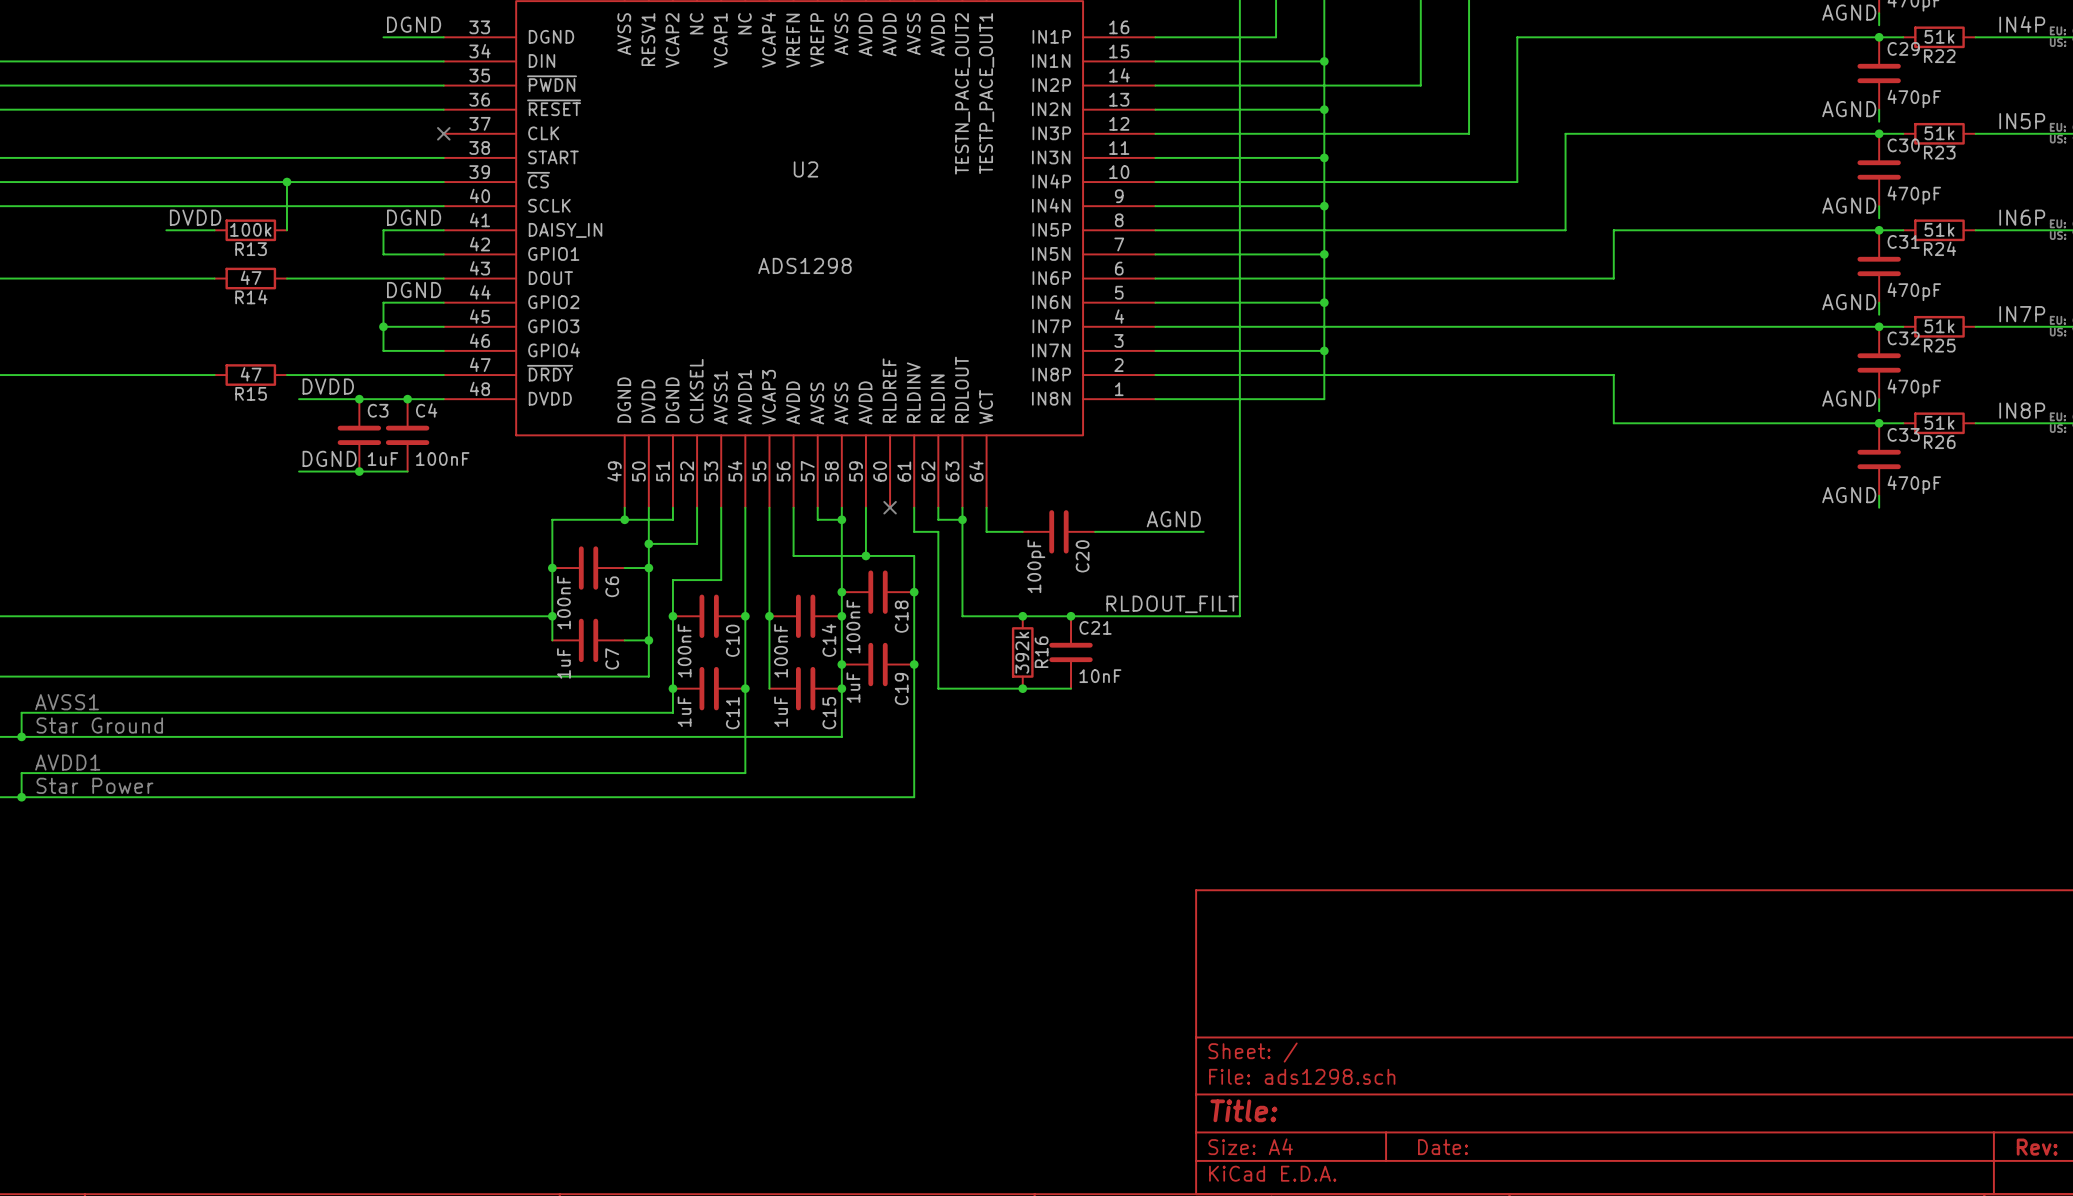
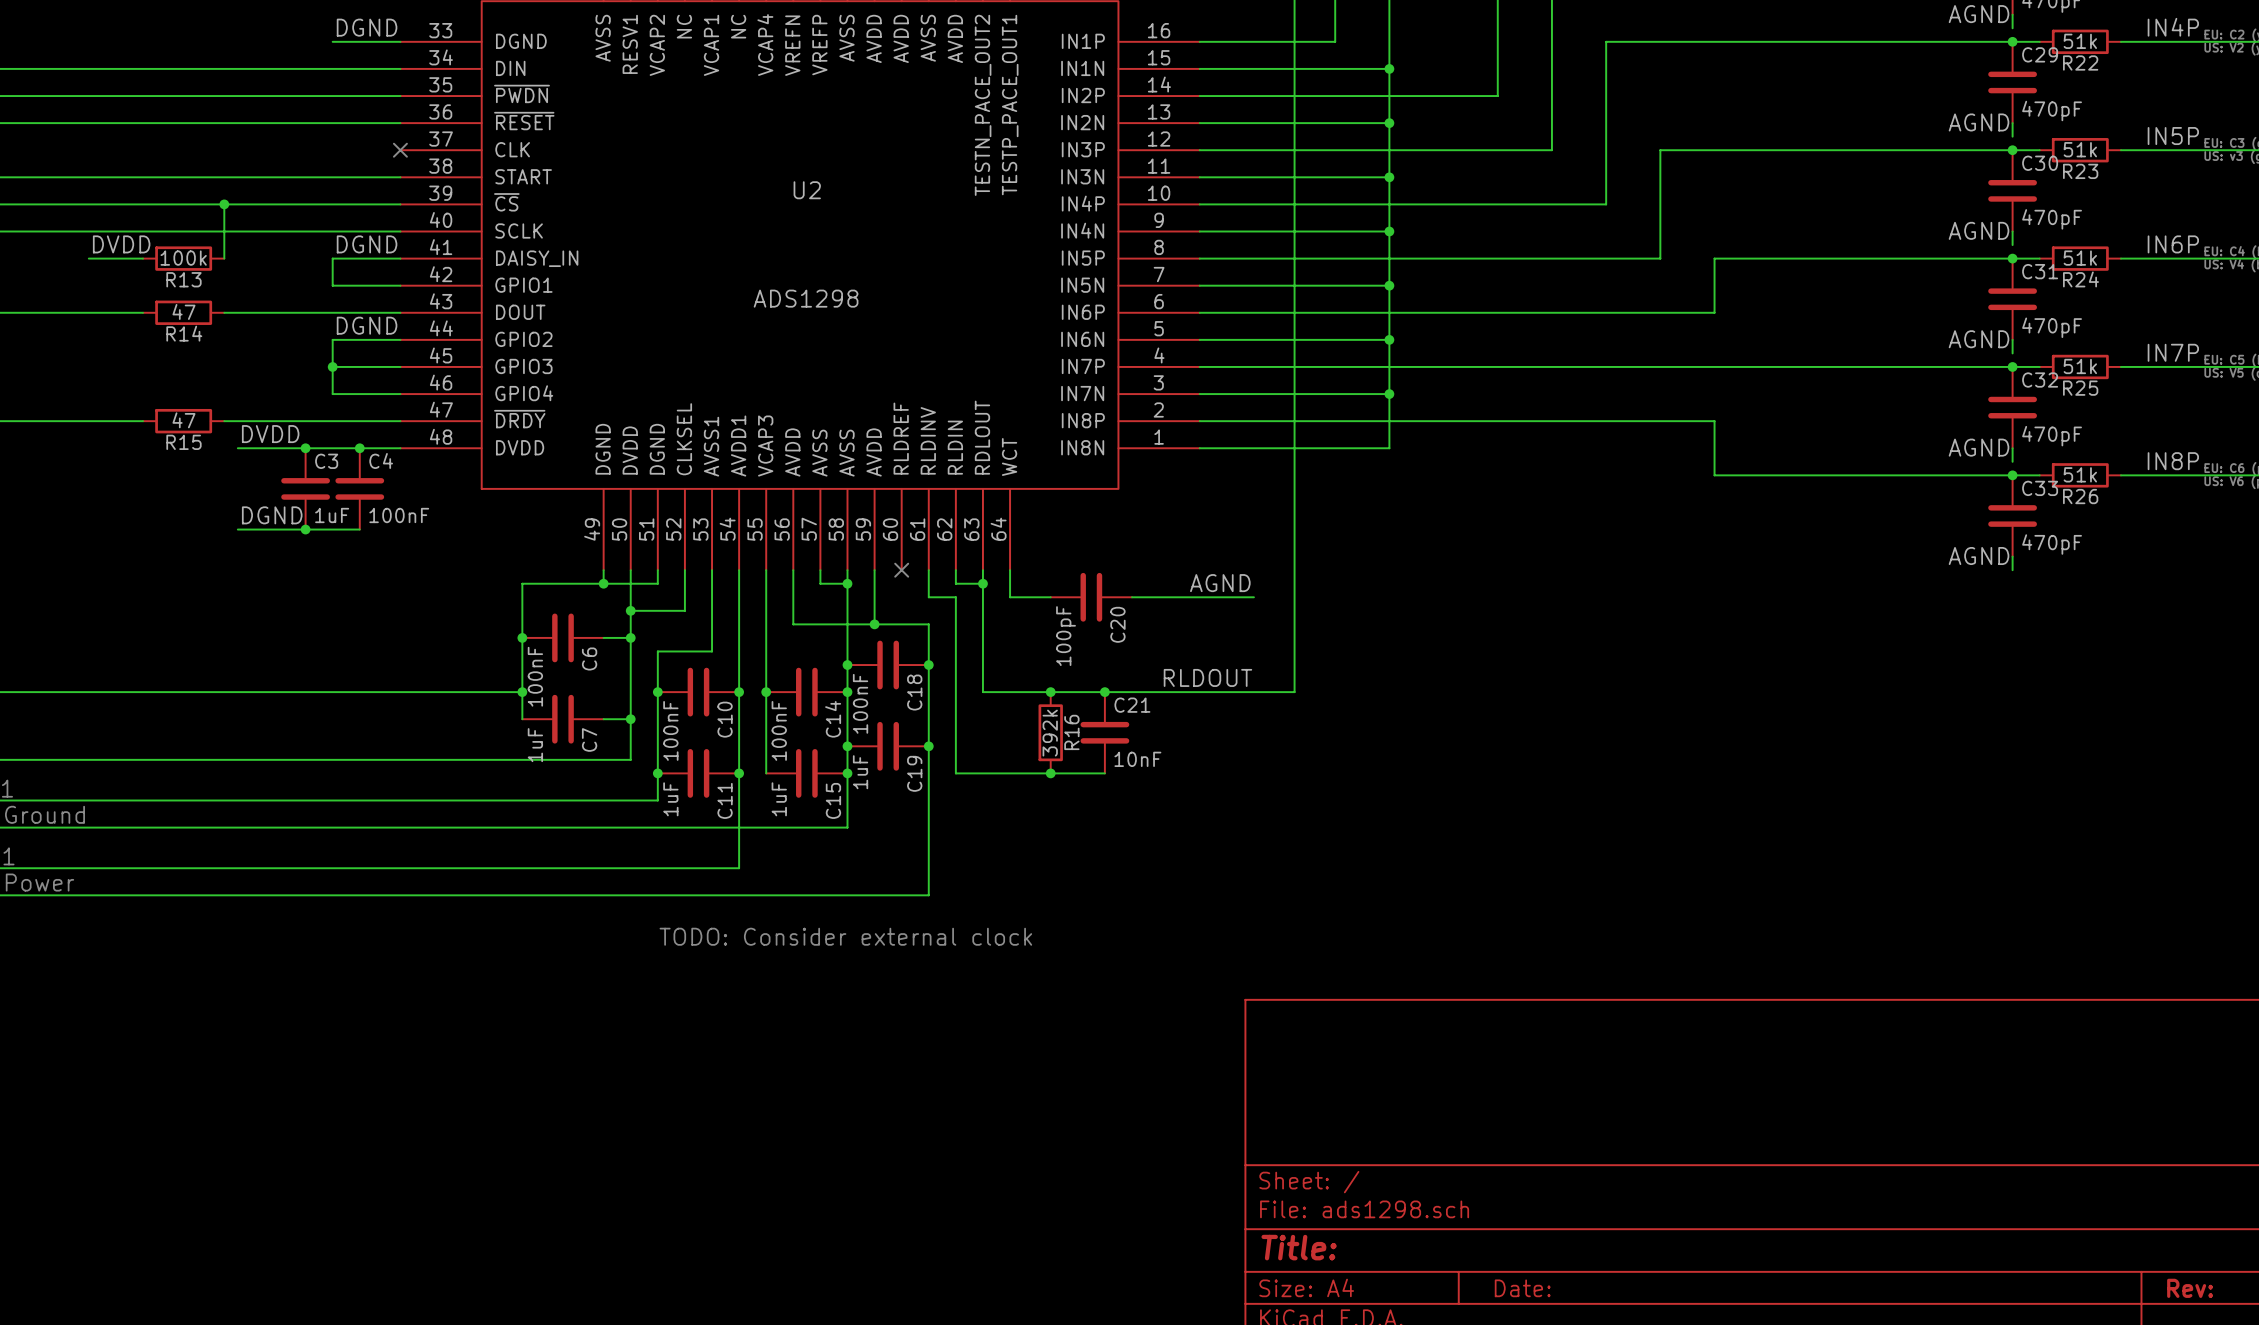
label: RLDOUT_FILT (1172, 604) -> RLDOUT (1207, 677)
text: none -> TODO: Consider external clock (845, 936)

